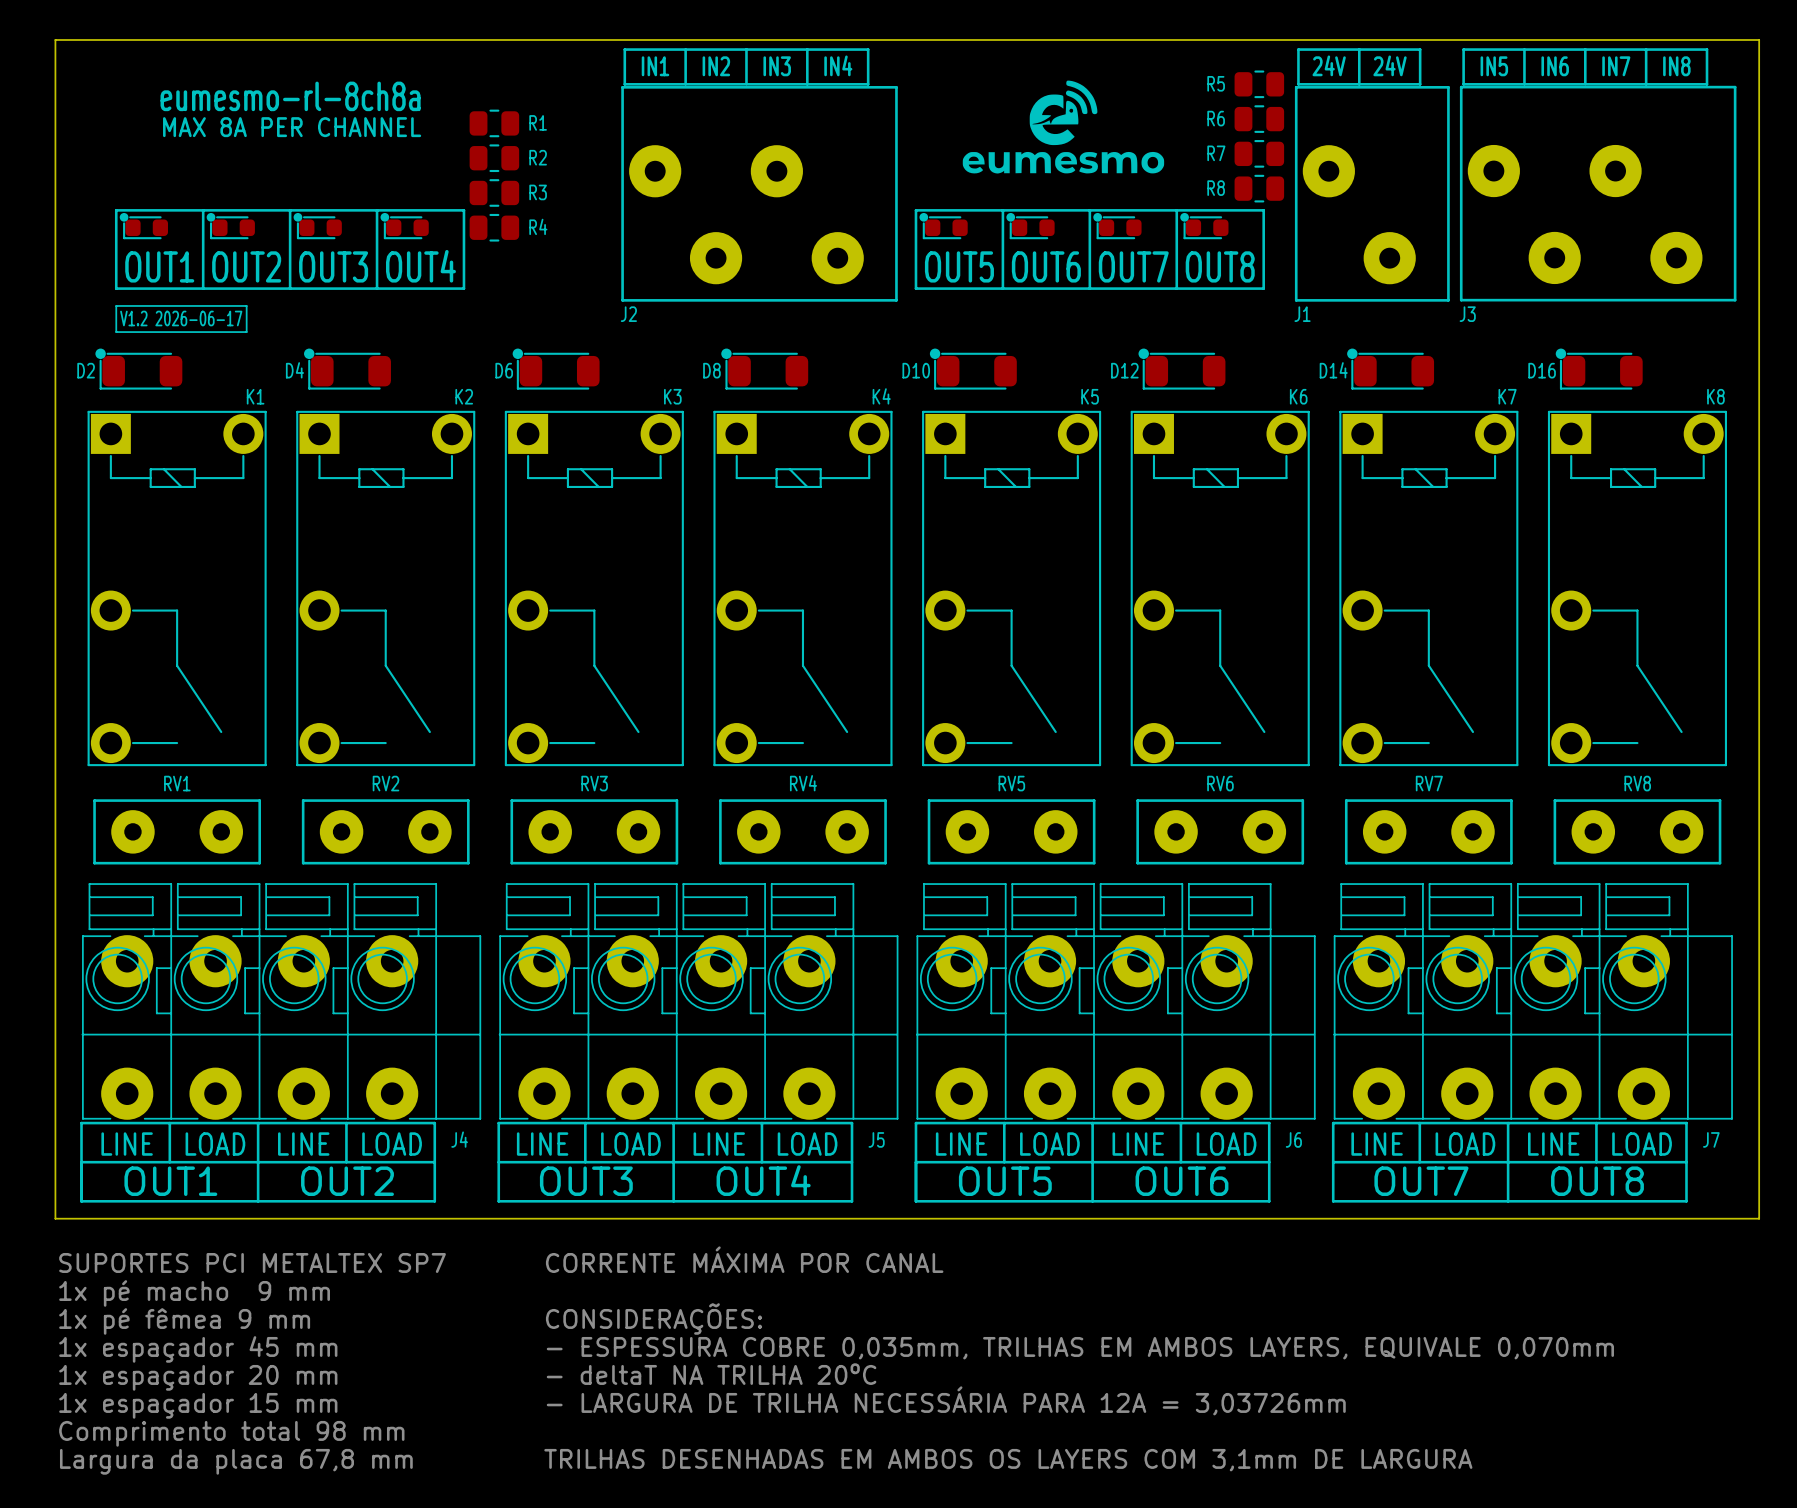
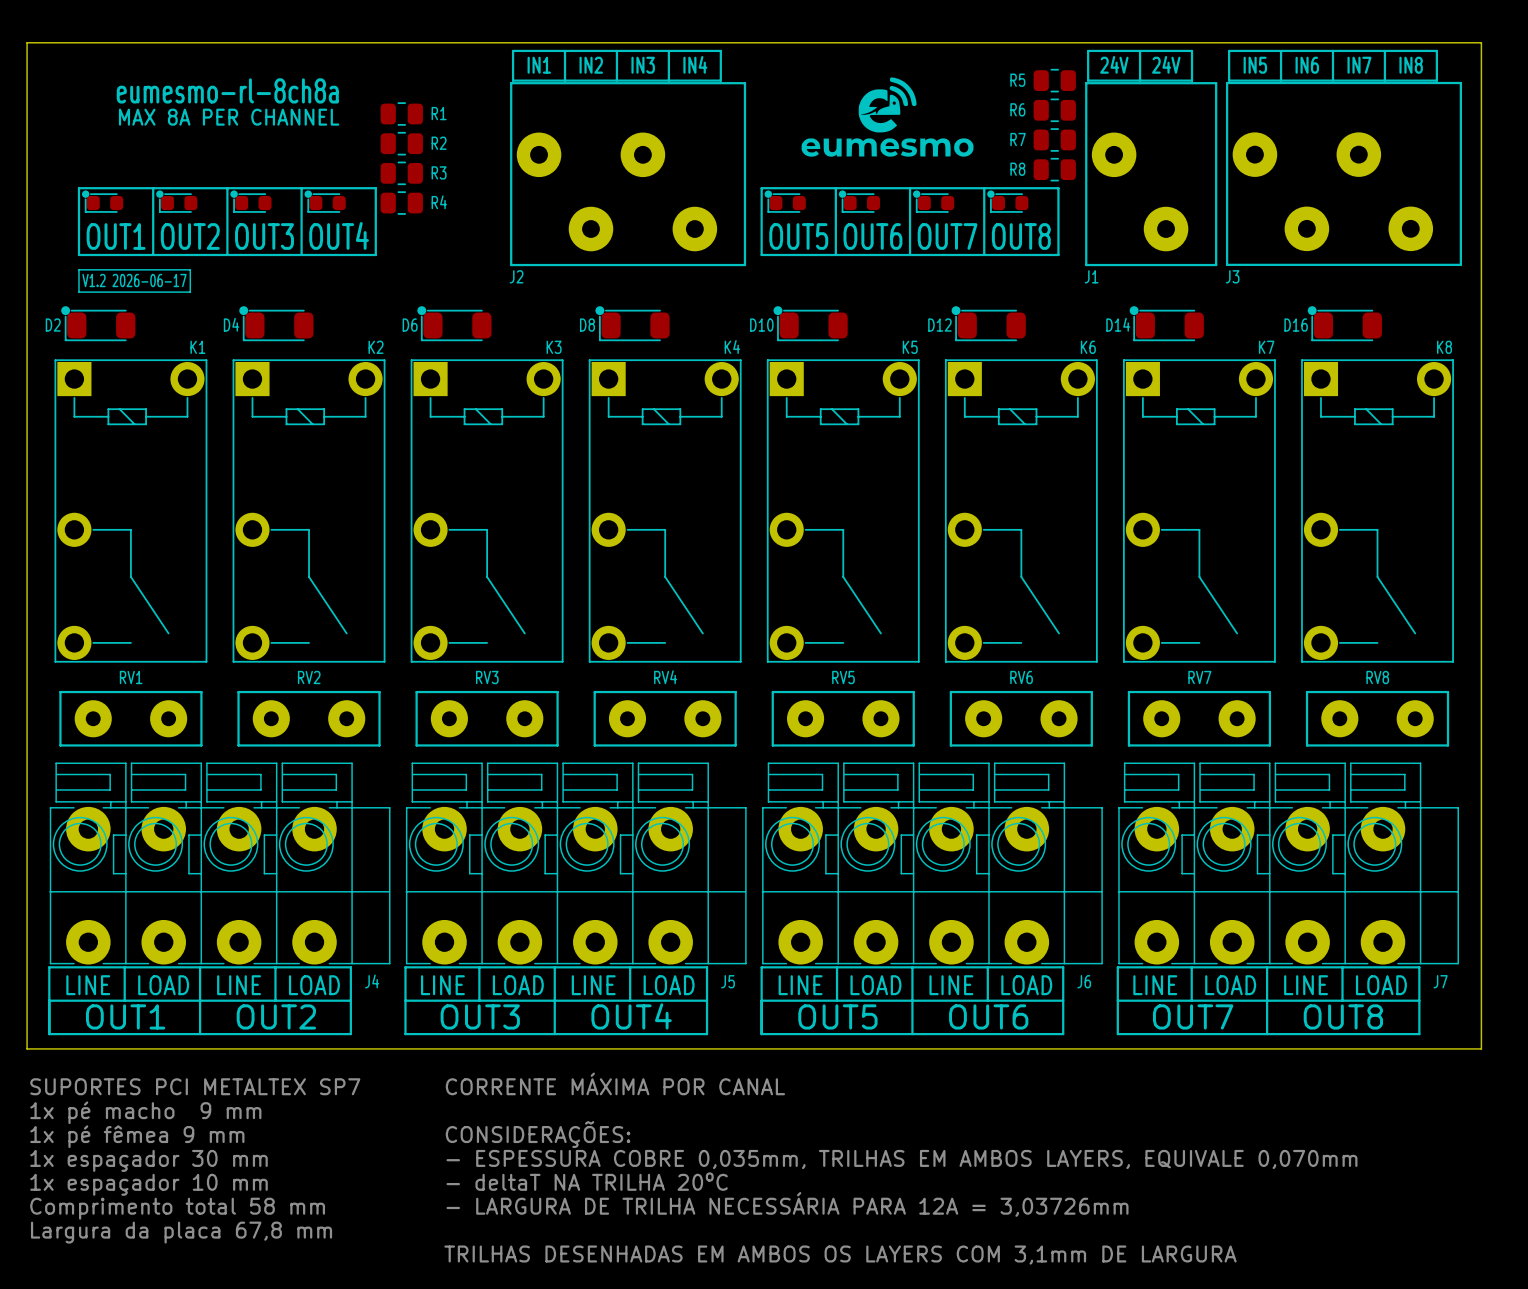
text: 1x espaçador 45 mm (198, 1349) -> 1x espaçador 30 mm (149, 1160)
text: 1x espaçador 20 mm (198, 1377) -> 1x espaçador 10 mm (149, 1184)
text: 1x espaçador 15 mm (198, 1405) -> Comprimento total 58 mm (177, 1208)
text: Comprimento total 98 mm (231, 1433) -> Largura da placa 67,8 mm (181, 1232)
text: Largura da placa 67,8 mm (236, 1461) -> none

